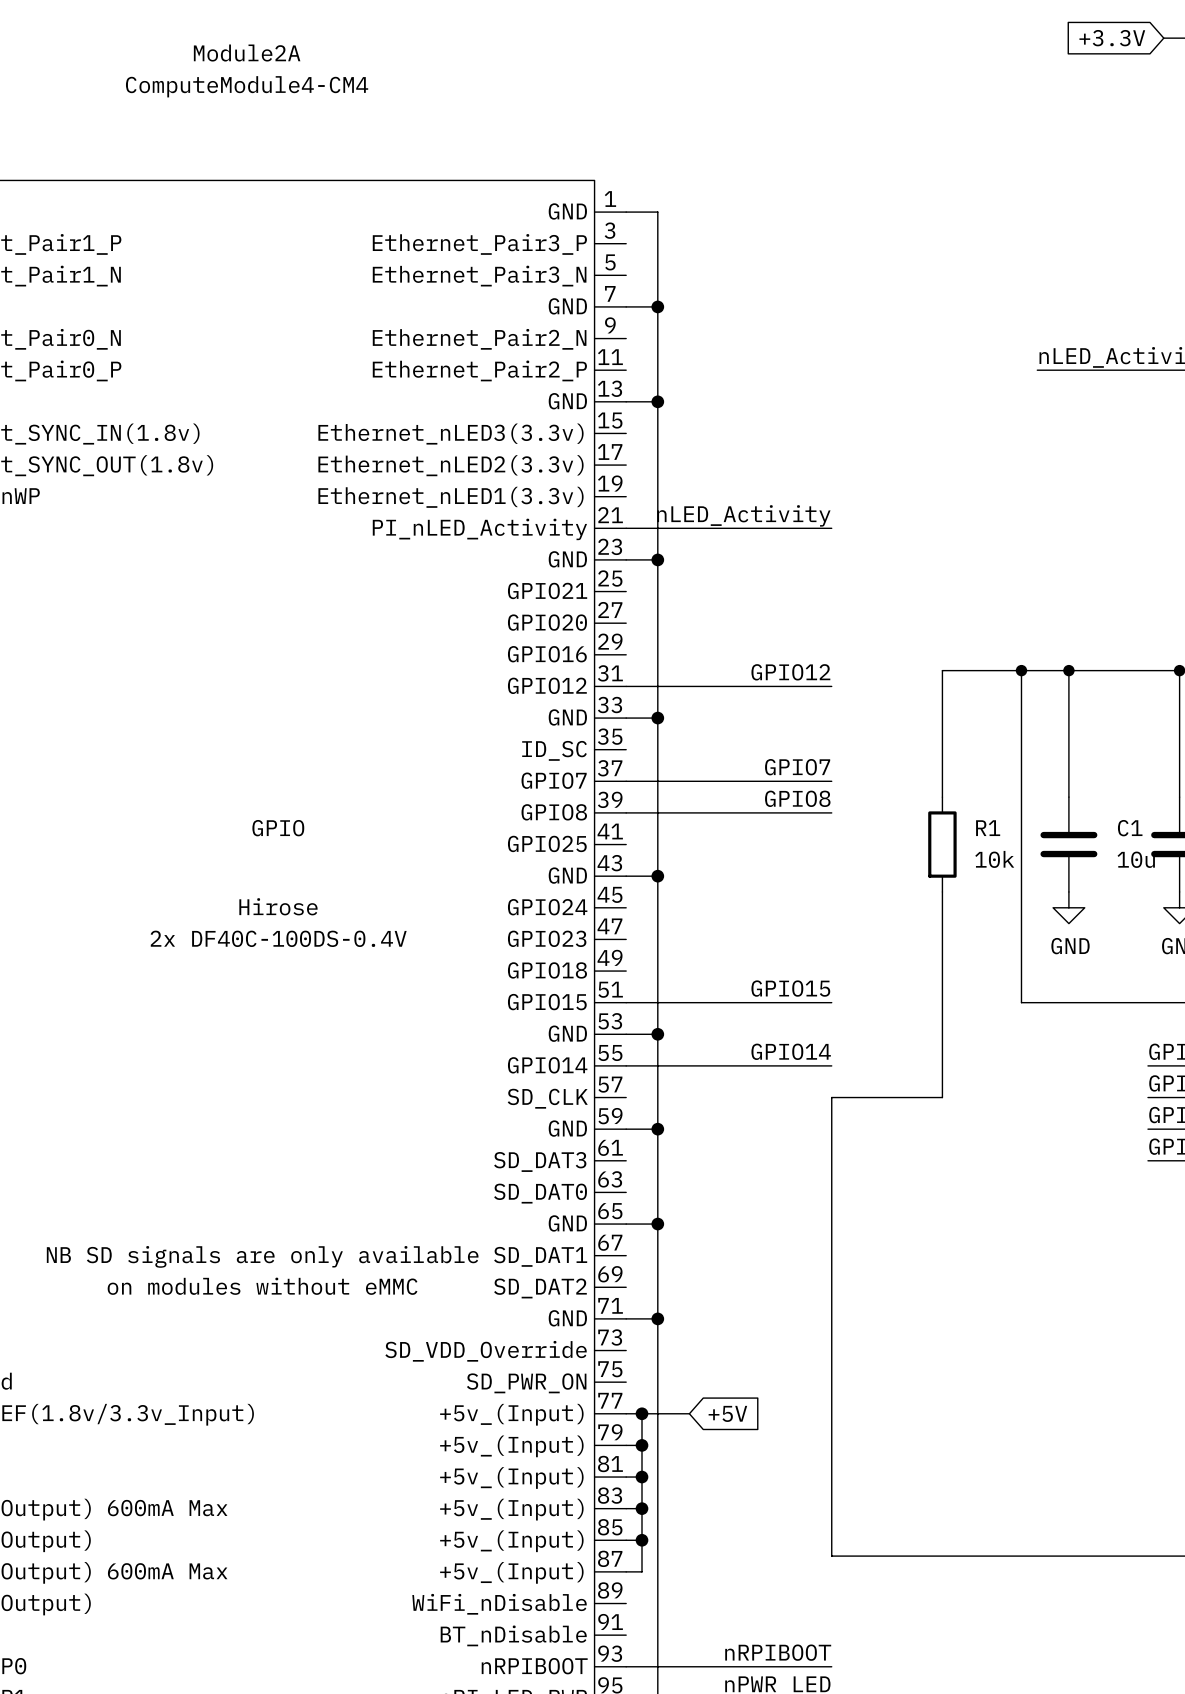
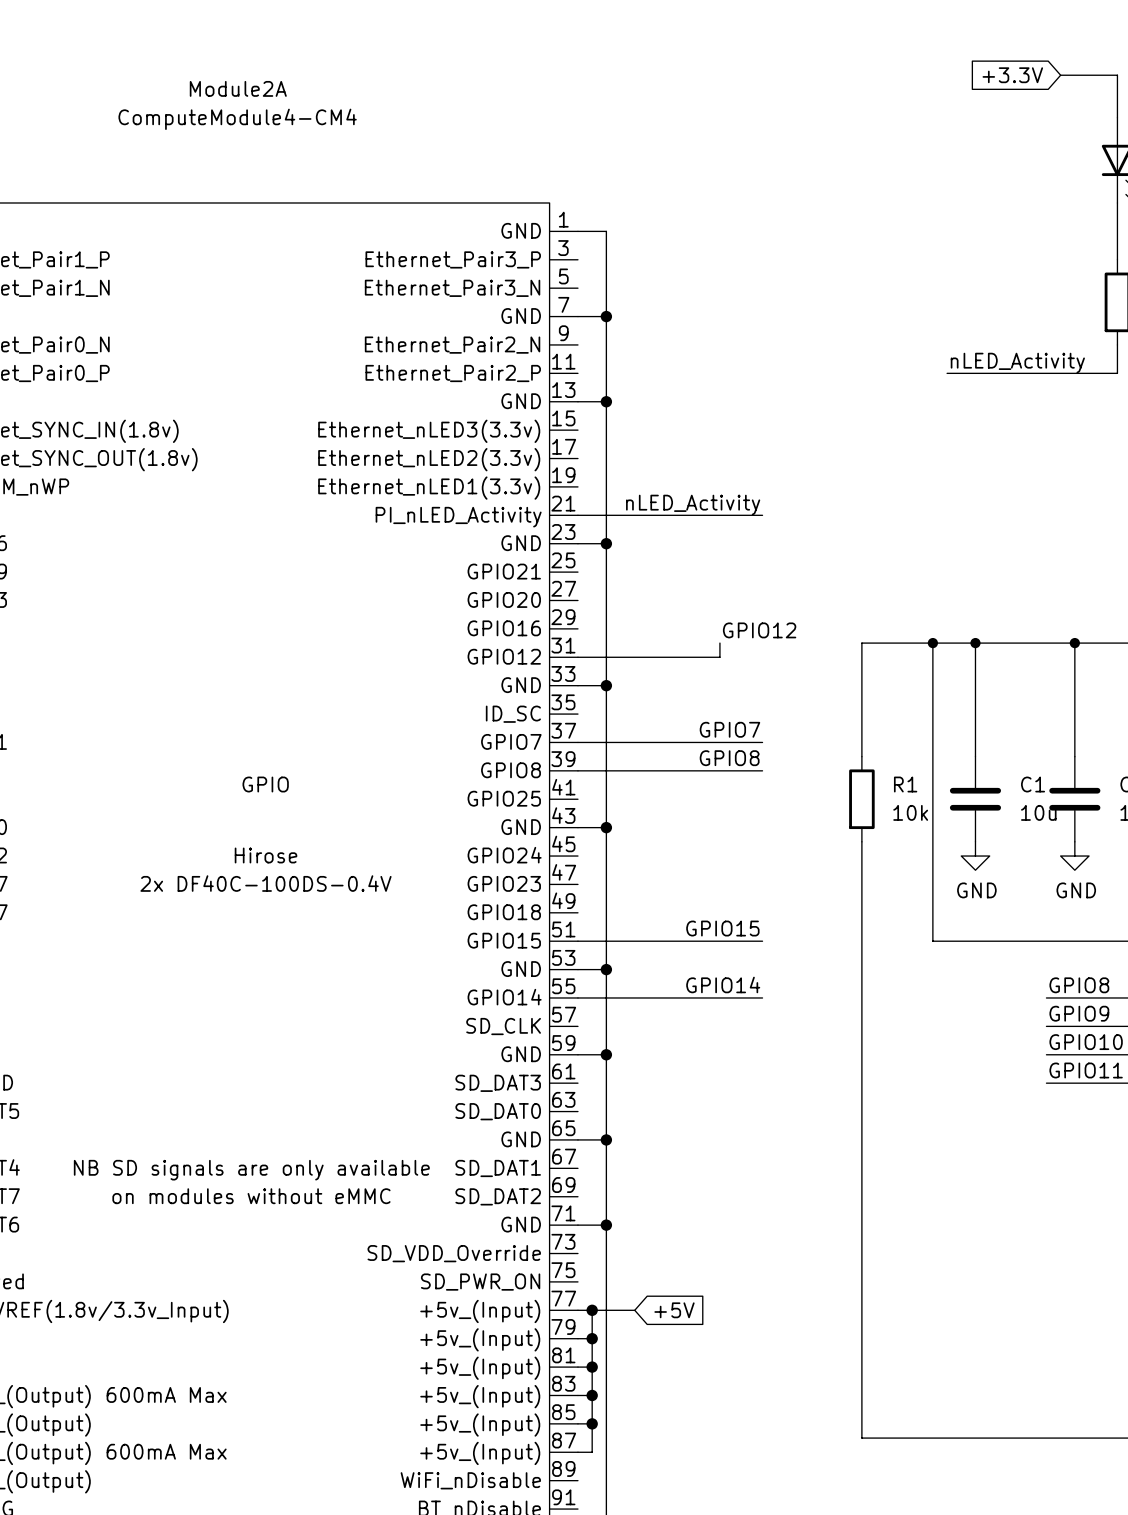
label position: GPIO12 (790, 672) -> GPIO12 (759, 630)
wire: (784, 686) (831, 686) -> (719, 657) (719, 643)
wire: (942, 1097) (831, 1097) (831, 1556) (942, 1556) -> (861, 1026) (861, 1438)

